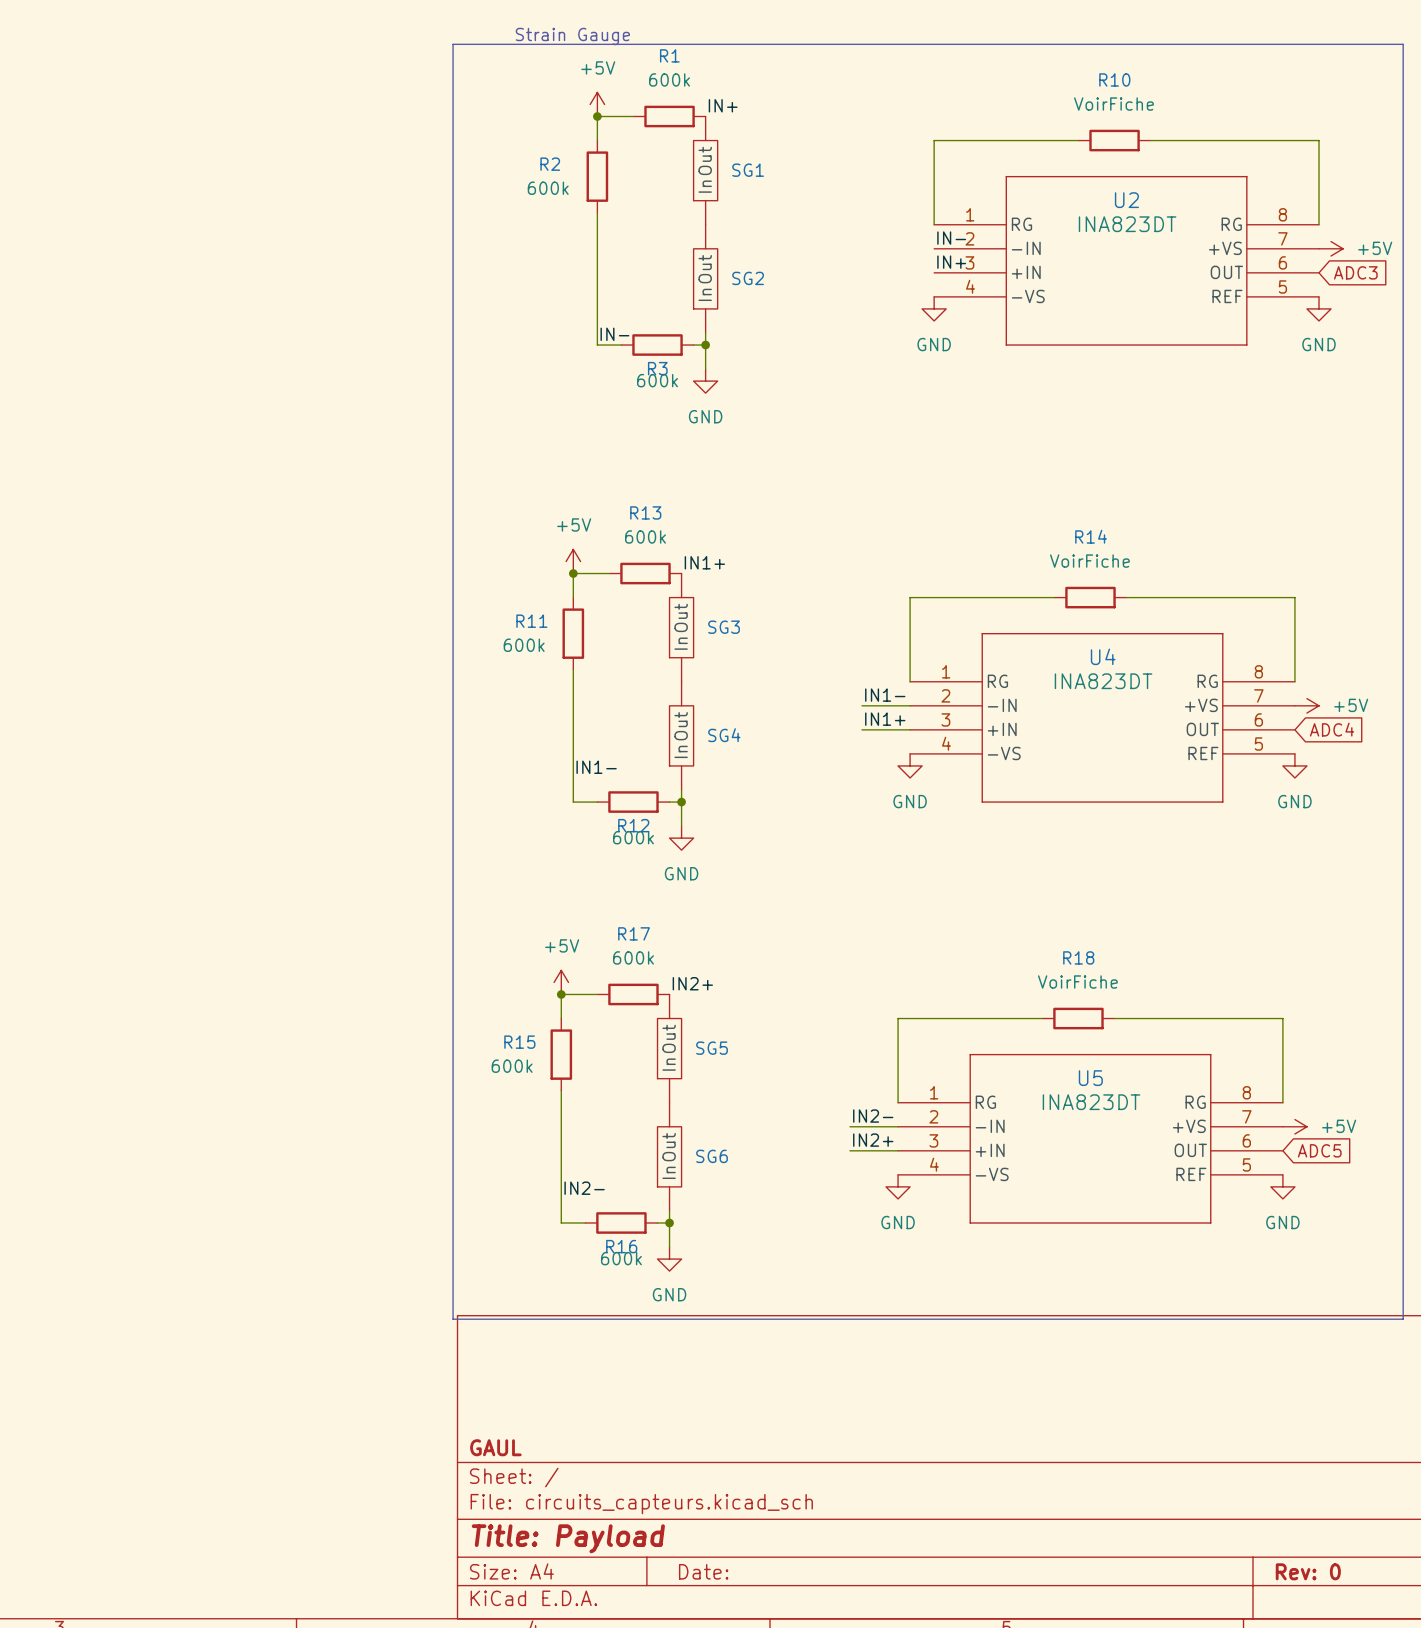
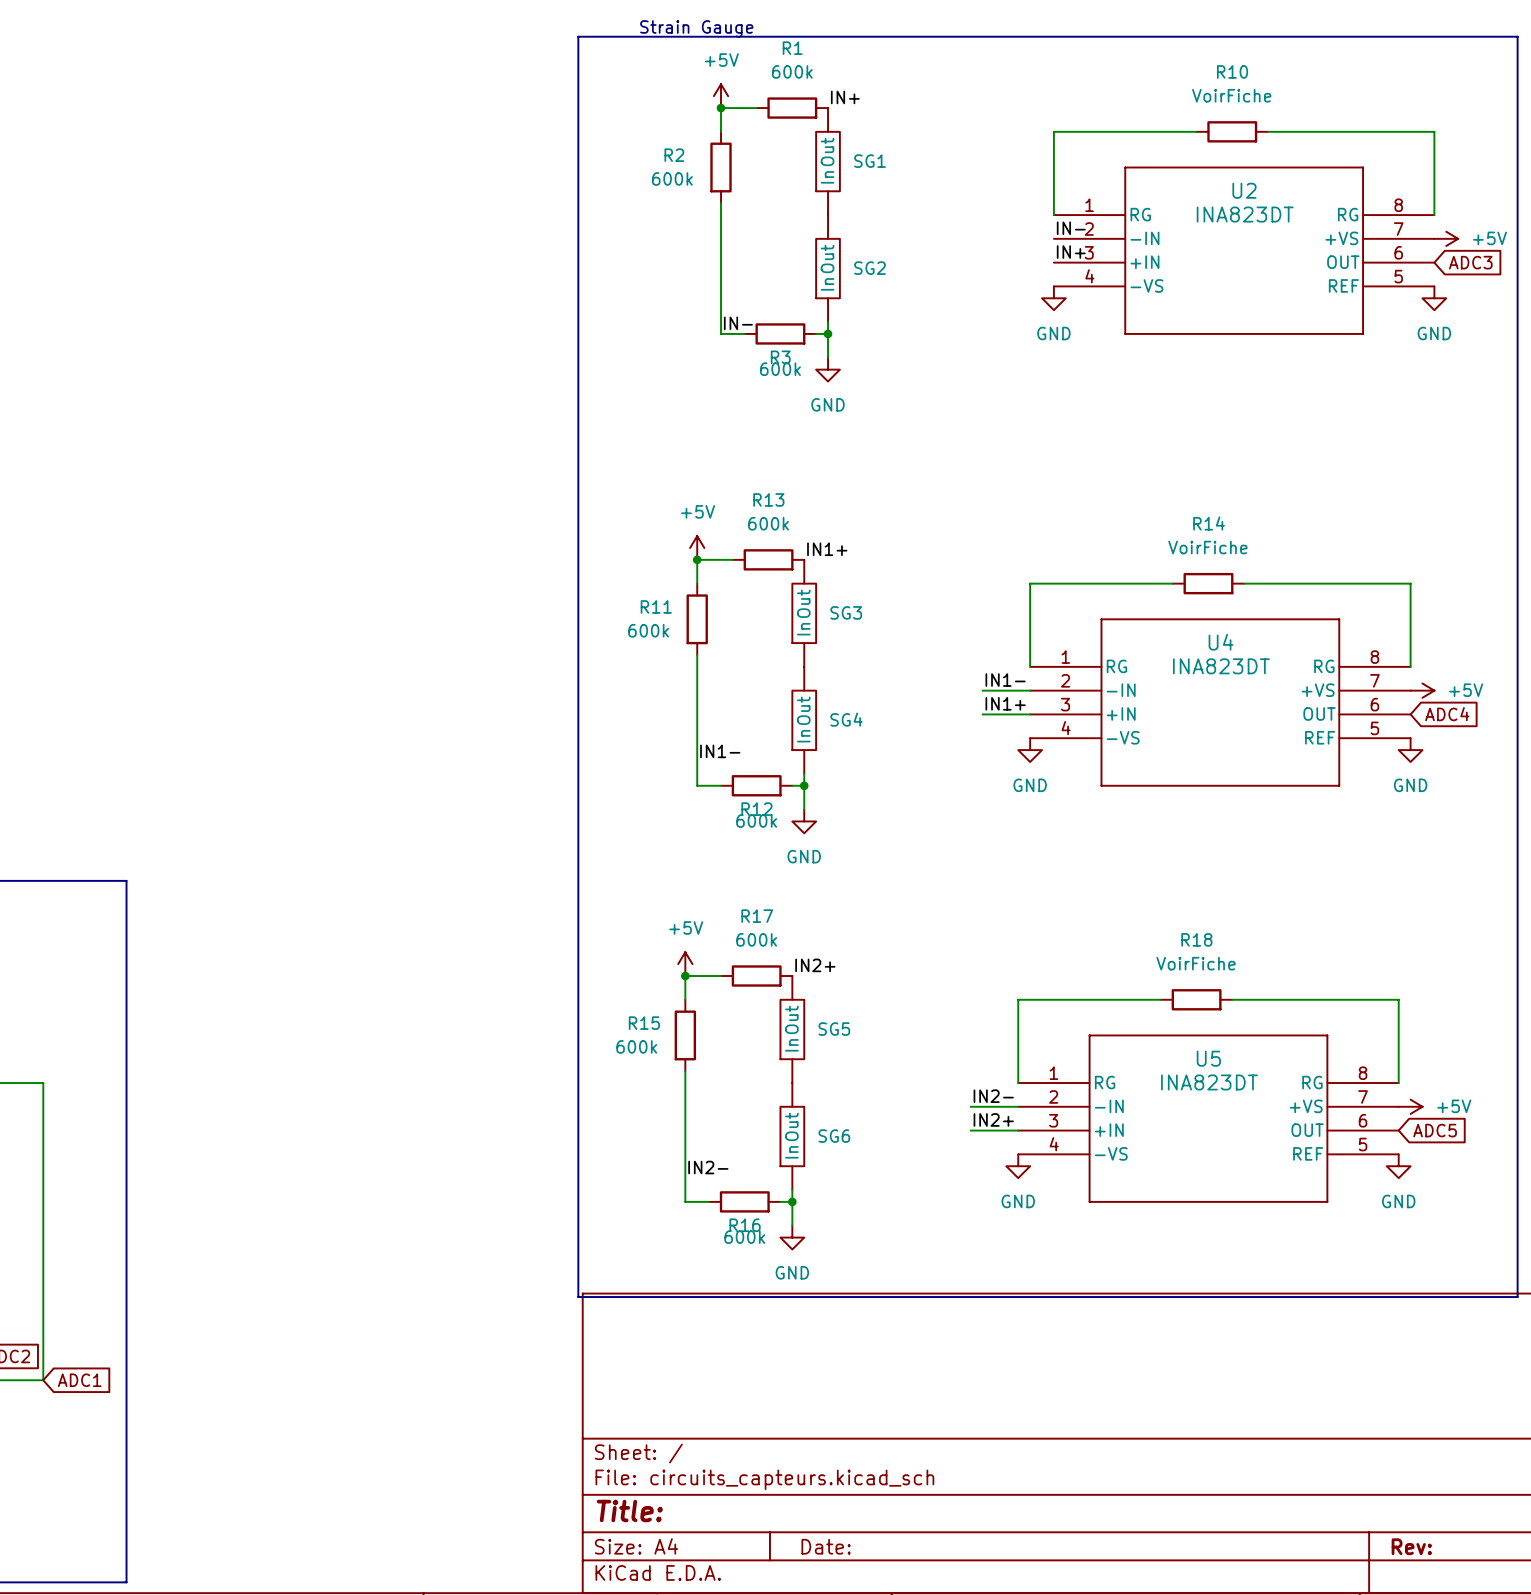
title block: GAUL (495, 1447) -> none
title block: Title: Payload (568, 1538) -> Title: (629, 1510)
title block: Rev: 0 (1308, 1571) -> Rev: (1411, 1546)

